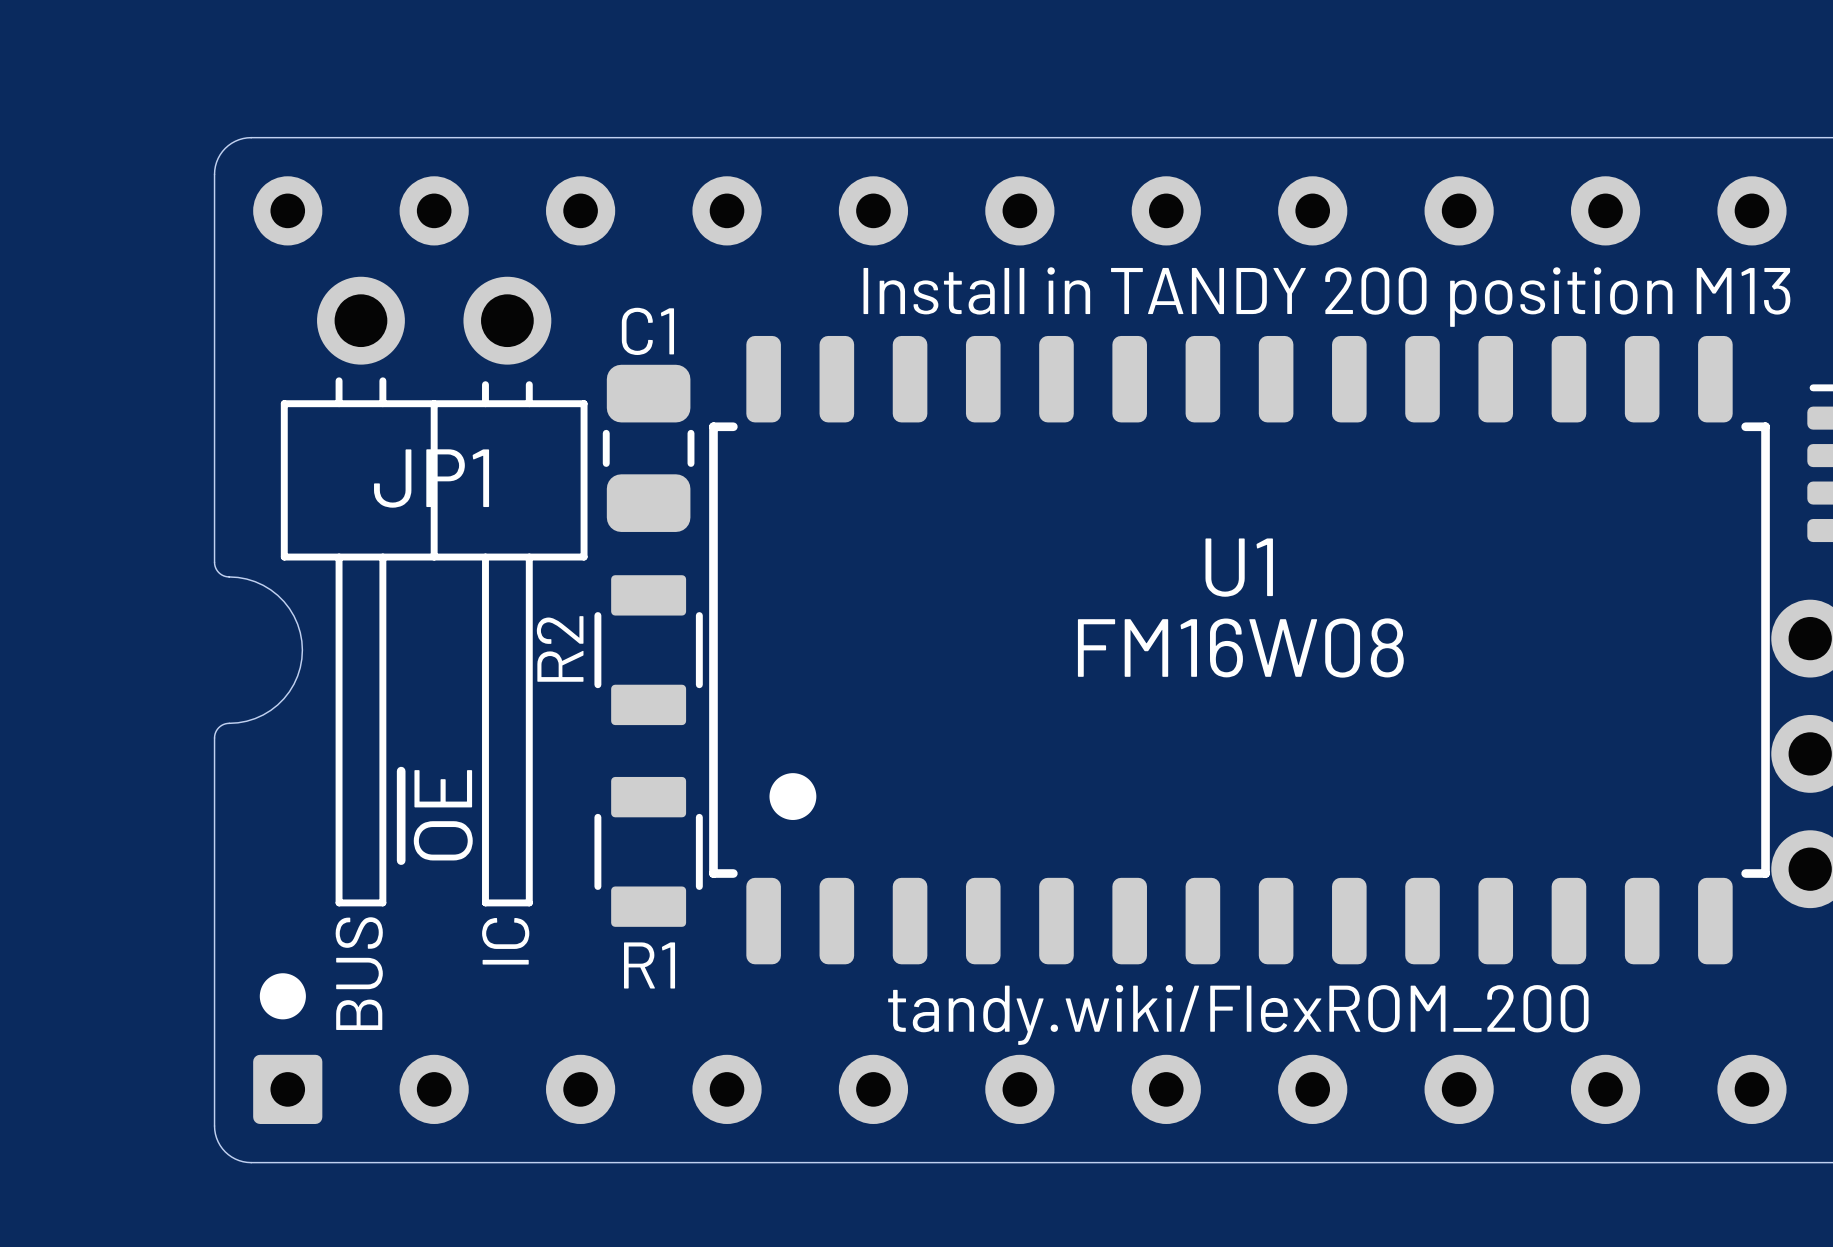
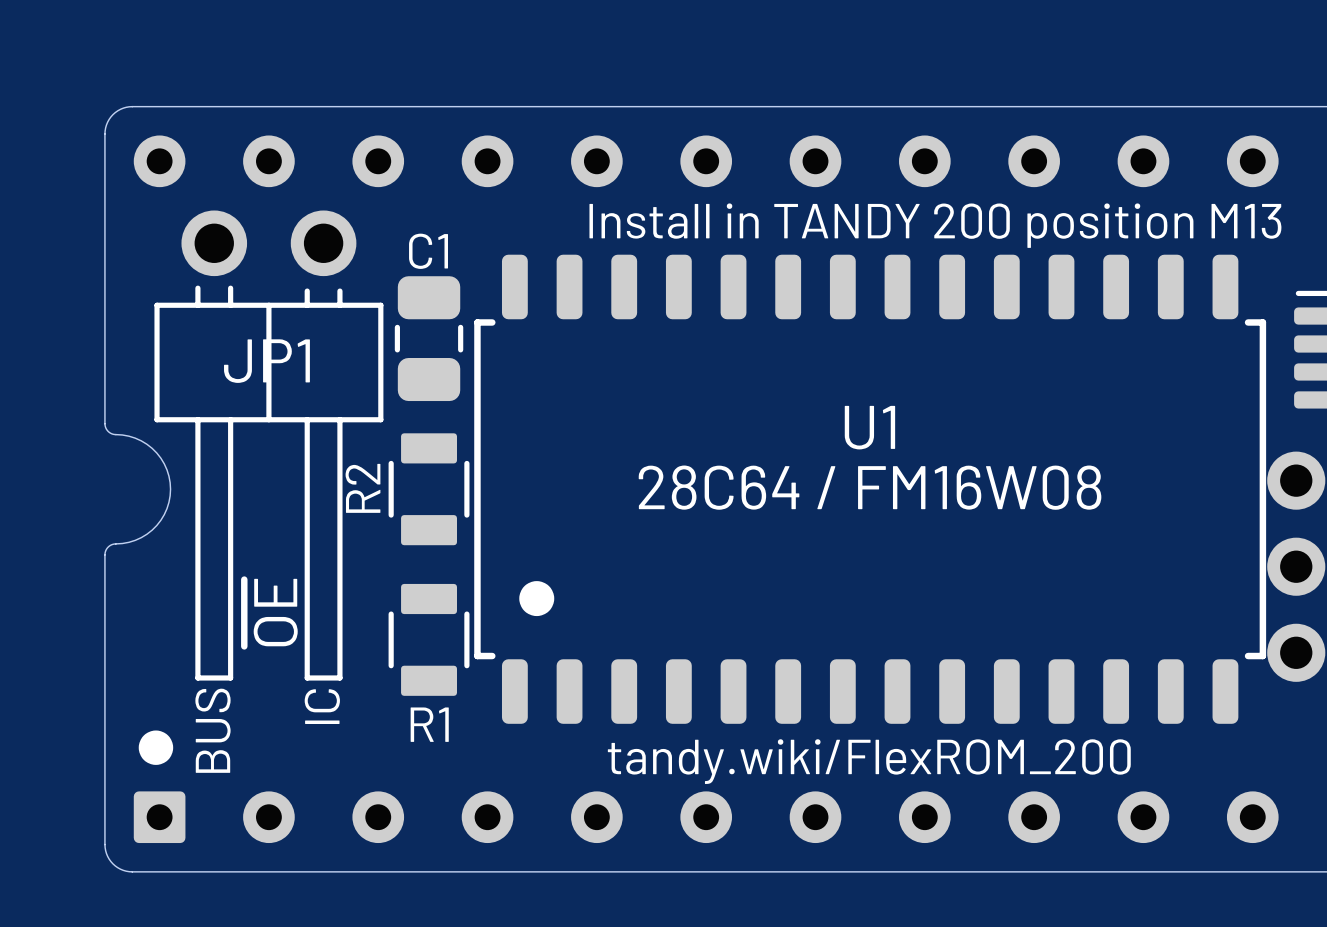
U1 value: FM16W08 (1240, 648) -> 28C64 / FM16W08 (870, 487)

